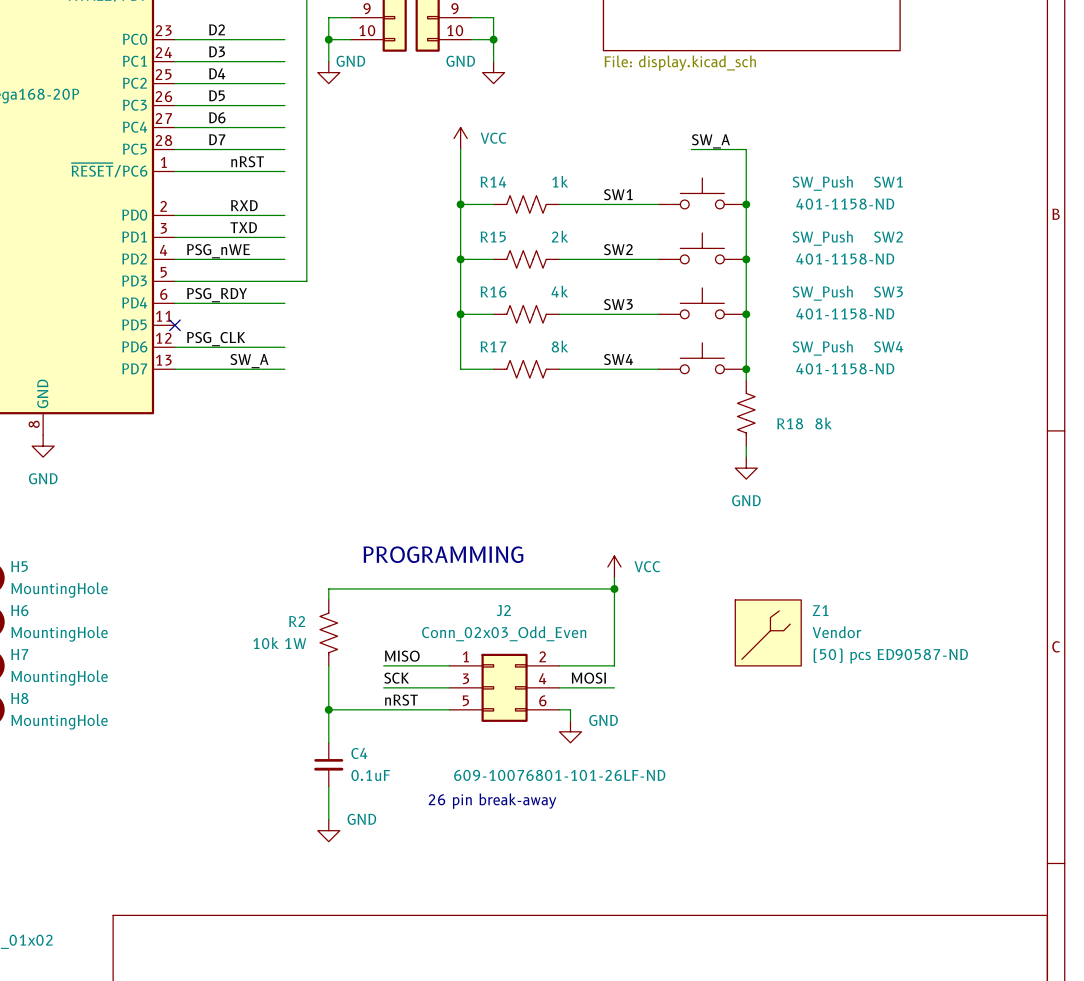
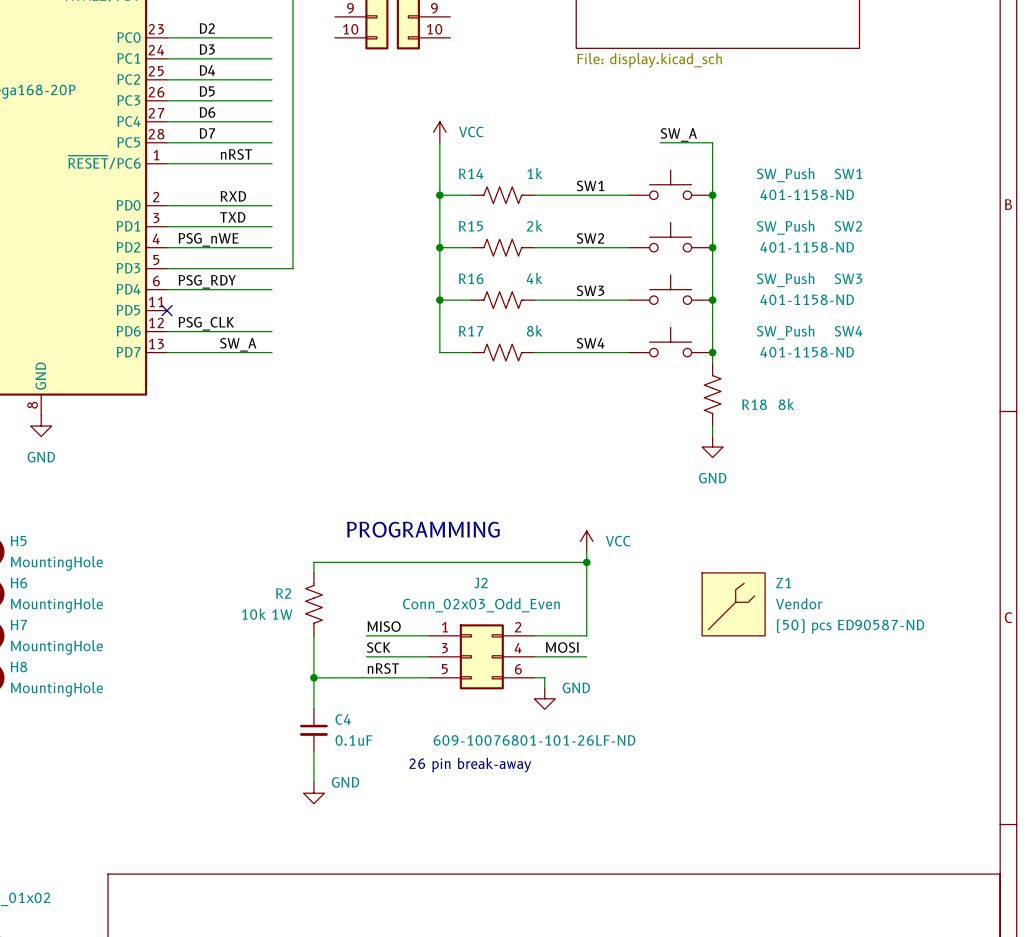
wire: (350, 17) (328, 17) (328, 61) -> none
wire: (471, 17) (493, 17) (493, 61) -> none
wire: (328, 39) (350, 39) -> none
junction: (328, 39) -> none
wire: (471, 39) (493, 39) -> none
junction: (493, 39) -> none
power symbol: GND (328, 72) -> none
power symbol: GND (493, 72) -> none

